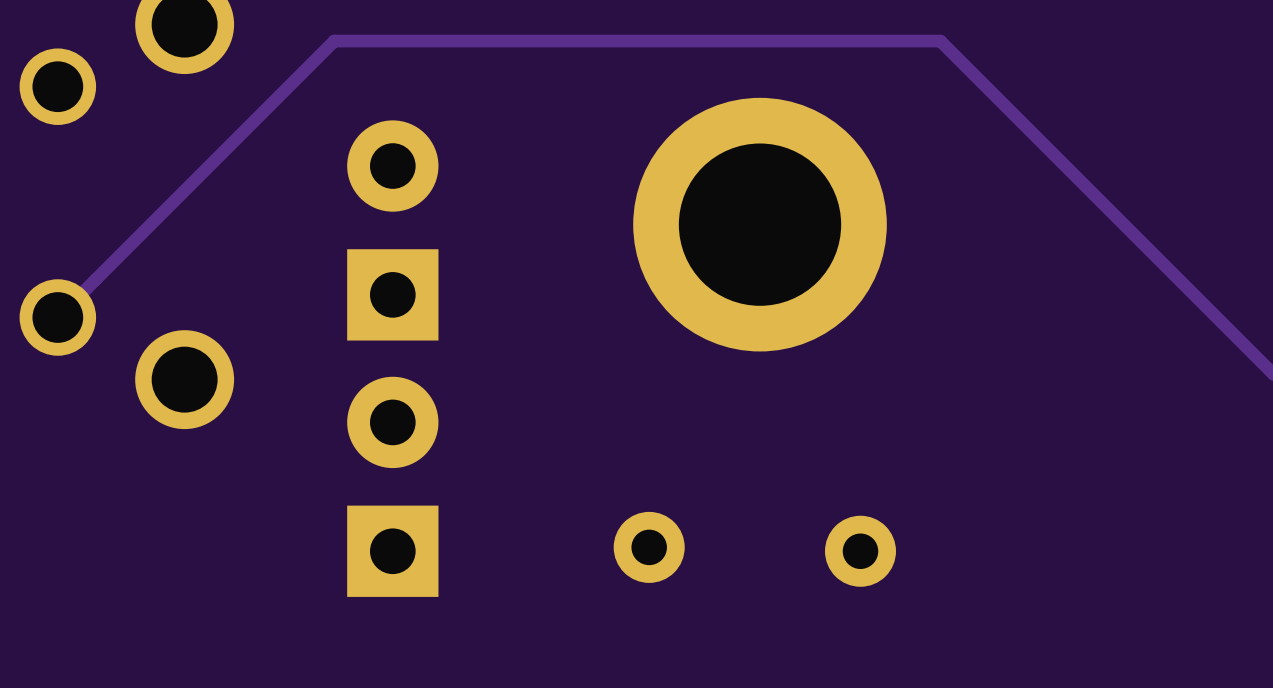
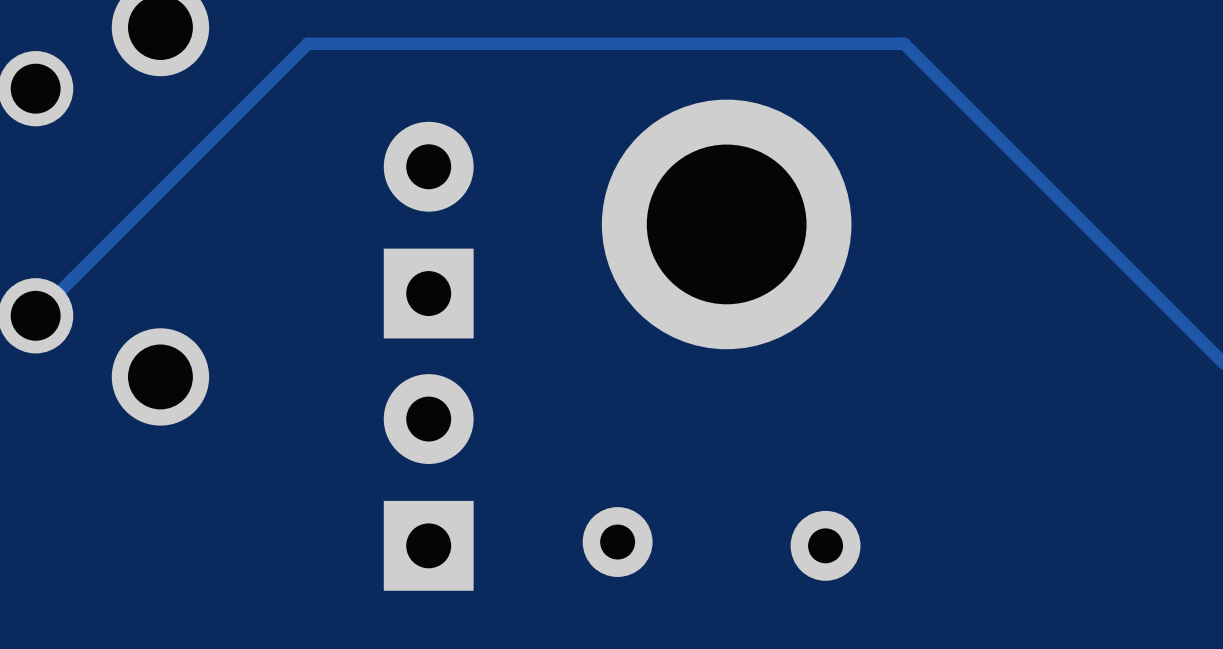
part position: (392, 230) -> (428, 230)
part position: (392, 486) -> (428, 482)

